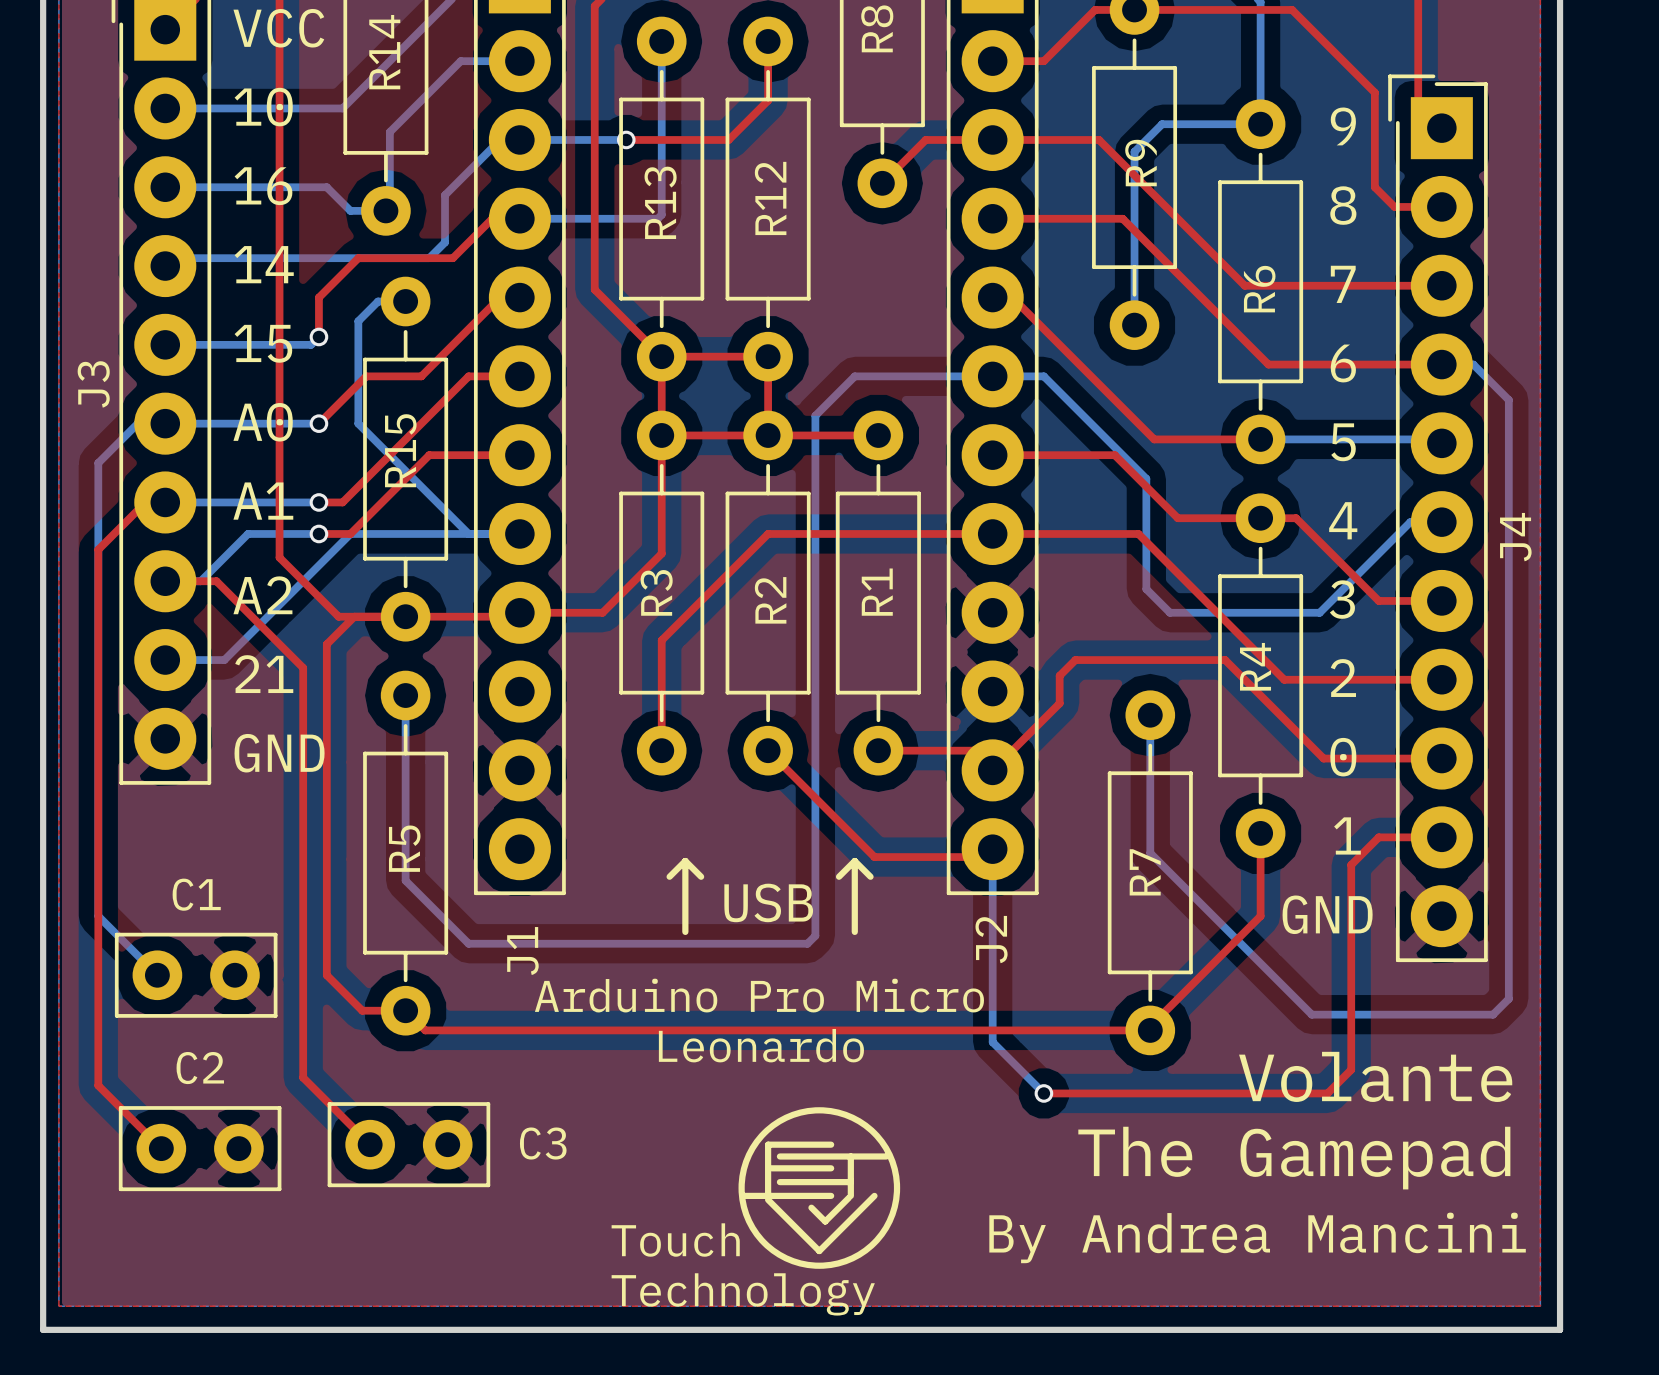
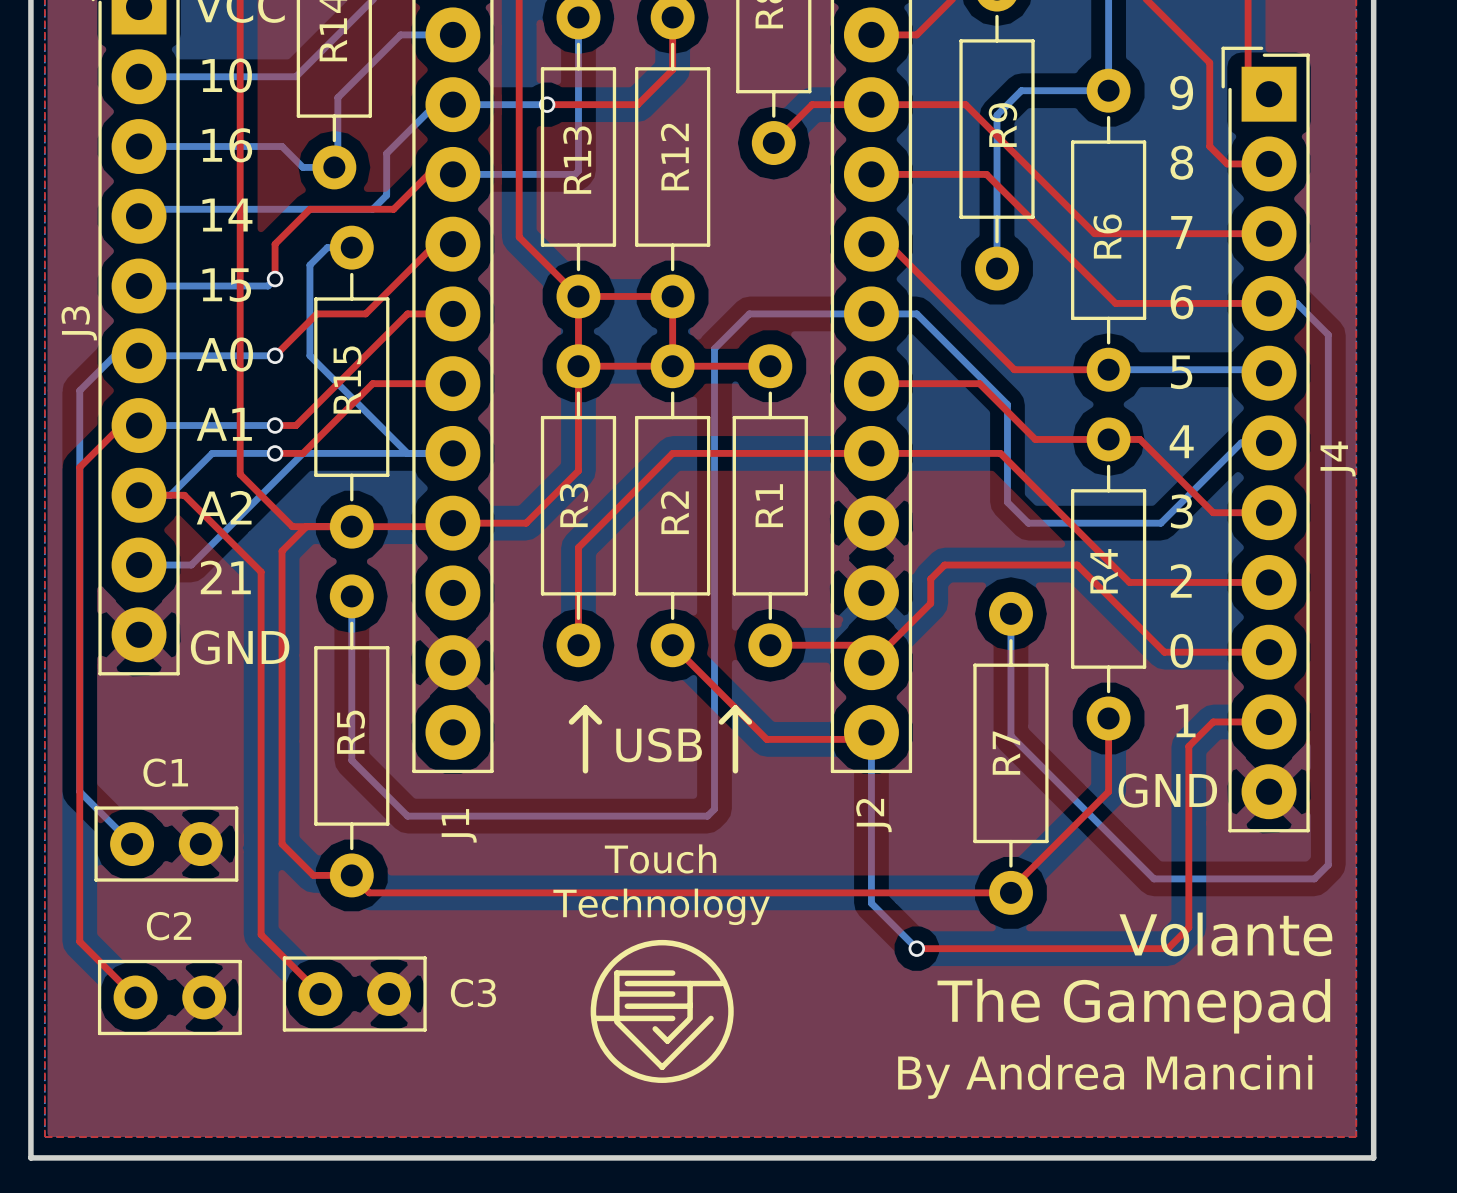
line: (685, 861) (685, 931) -> (585, 708) (585, 770)
line: (685, 861) (701, 876) -> (585, 708) (599, 721)
line: (685, 861) (669, 876) -> (585, 708) (571, 721)
line: (854, 861) (854, 931) -> (735, 708) (735, 770)
line: (854, 861) (870, 876) -> (735, 708) (749, 721)
line: (854, 861) (839, 876) -> (735, 708) (721, 721)
text position: USB (768, 902) -> USB (659, 745)
text: Arduino Pro Micro (759, 995) -> none
text: Leonardo (761, 1045) -> none
line: (831, 1144) (768, 1144) (768, 1195) -> (672, 973) (616, 973) (616, 1018)
line: (779, 1156) (886, 1156) -> (627, 983) (721, 983)
line: (850, 1156) (850, 1195) -> (690, 983) (690, 1018)
line: (772, 1168) (831, 1168) -> (620, 994) (672, 994)
line: (779, 1182) (850, 1182) -> (627, 1006) (690, 1006)
drawing position: (819, 1188) -> (662, 1011)
line: (744, 1195) (831, 1195) -> (595, 1018) (672, 1018)
line: (874, 1195) (819, 1251) (768, 1199) -> (711, 1018) (662, 1067) (616, 1021)
line: (848, 1197) (825, 1221) (811, 1207) -> (688, 1020) (667, 1041) (655, 1028)
text position: Touch (675, 1240) -> Touch (660, 858)
text position: Technology (743, 1294) -> Technology (661, 906)

